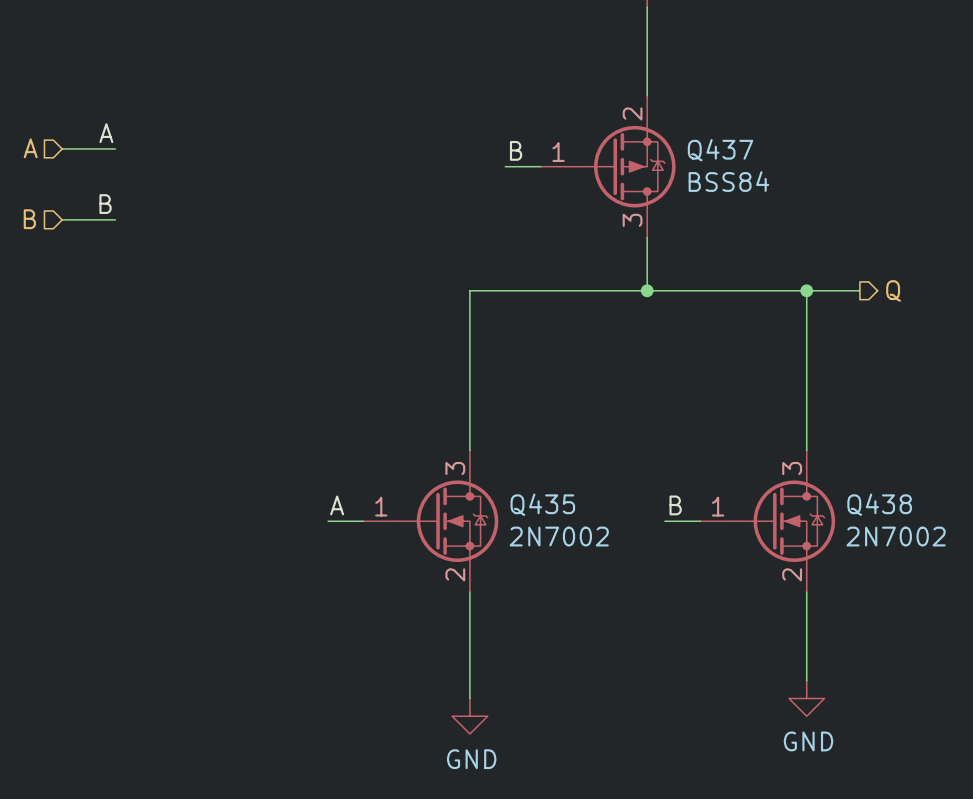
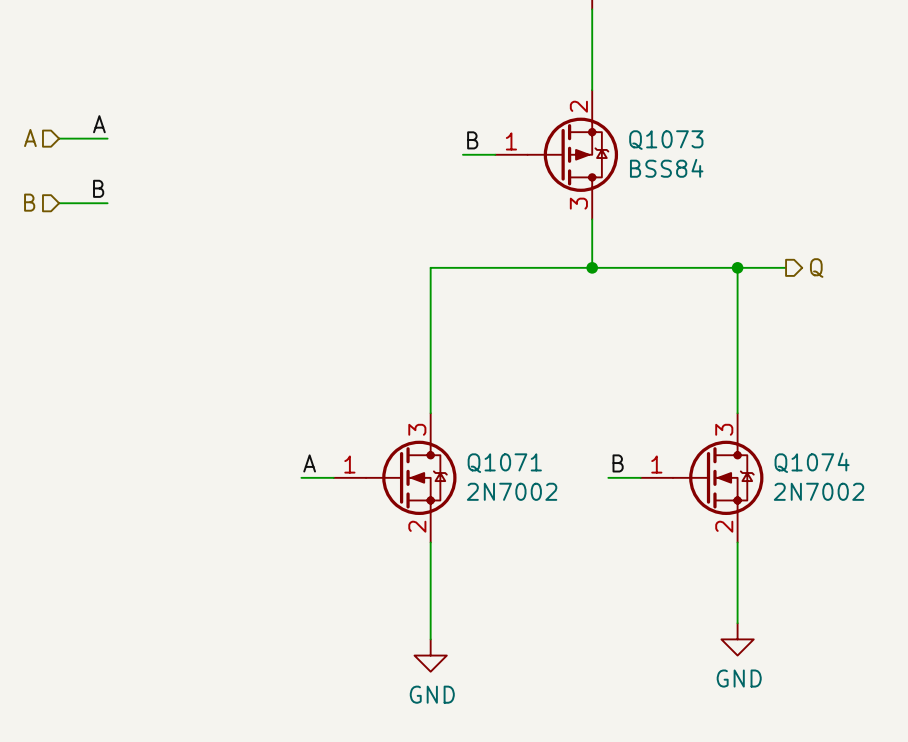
Q437 name: Q437 (720, 150) -> Q1073 (666, 140)
Q435 name: Q435 (542, 504) -> Q1071 (504, 463)
Q438 name: Q438 (879, 504) -> Q1074 (812, 462)

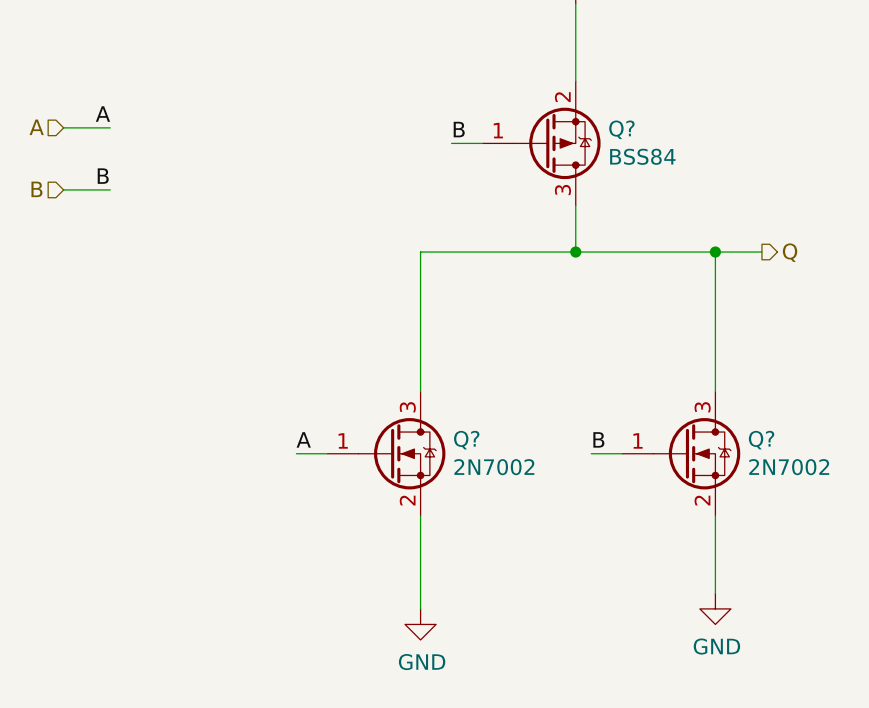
Q1073 name: Q1073 (666, 140) -> Q? (621, 129)
Q1074 name: Q1074 (812, 462) -> Q? (761, 440)
Q1071 name: Q1071 (504, 463) -> Q? (466, 440)

